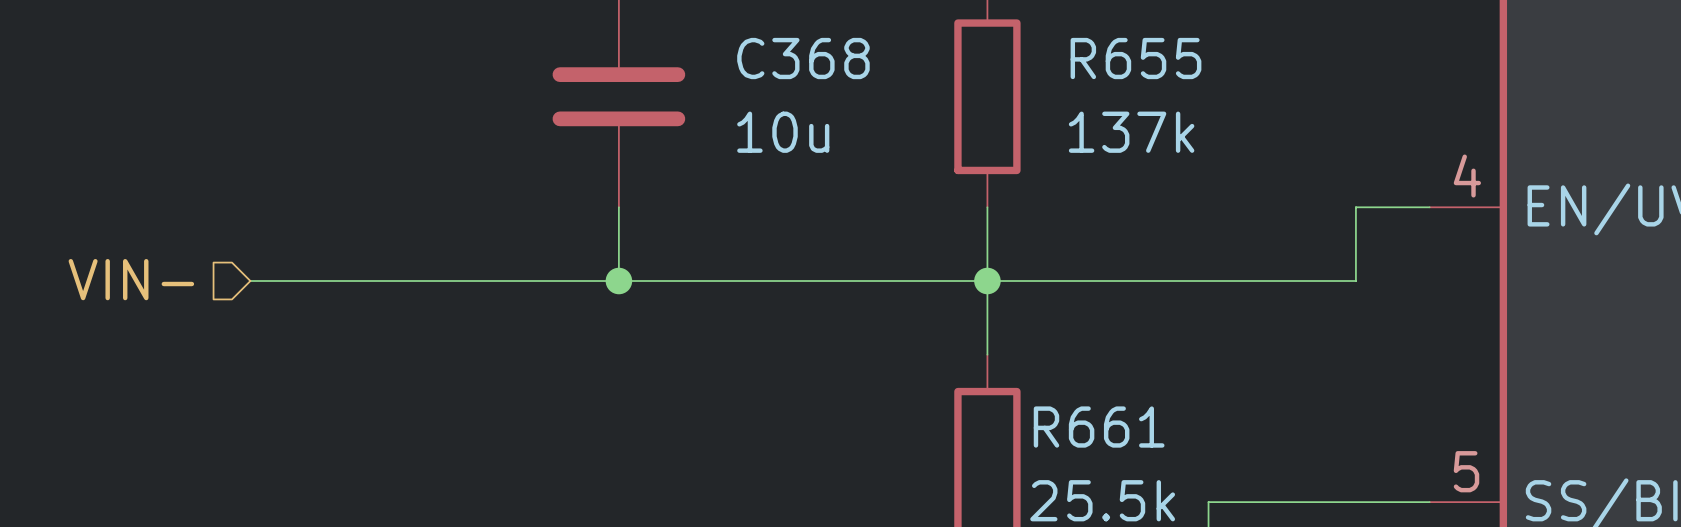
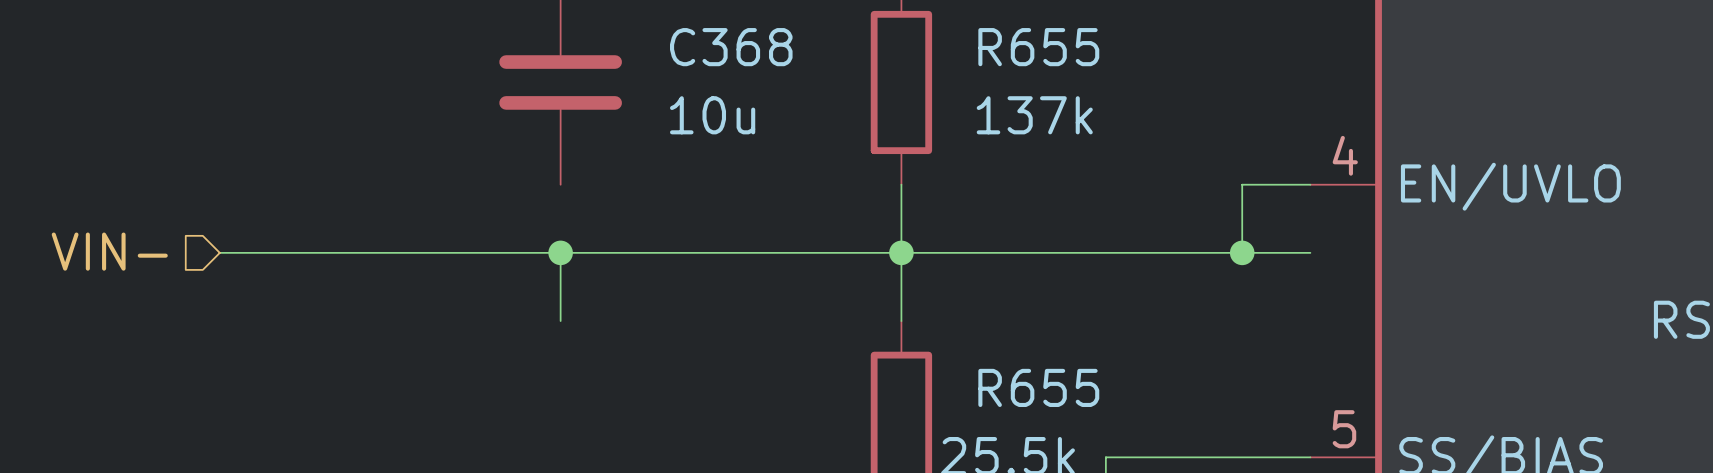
wire: (618, 207) (618, 281) -> (560, 321) (560, 252)
wire: none -> (1242, 252) (1310, 252)
junction: none -> (1242, 252)
R661 name: R661 (1099, 427) -> R655 (1038, 387)

